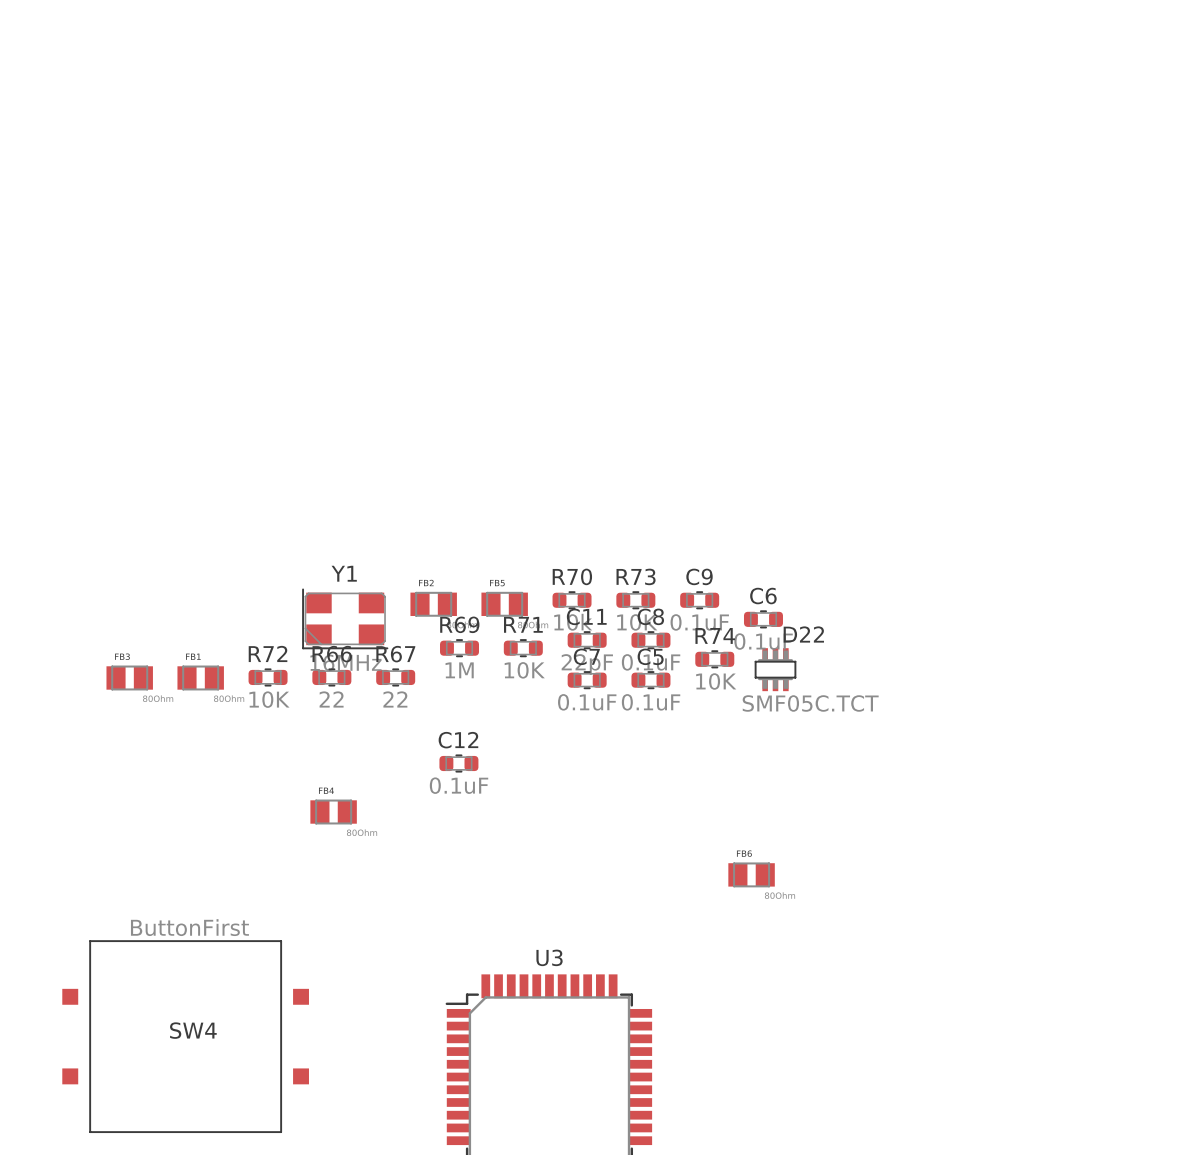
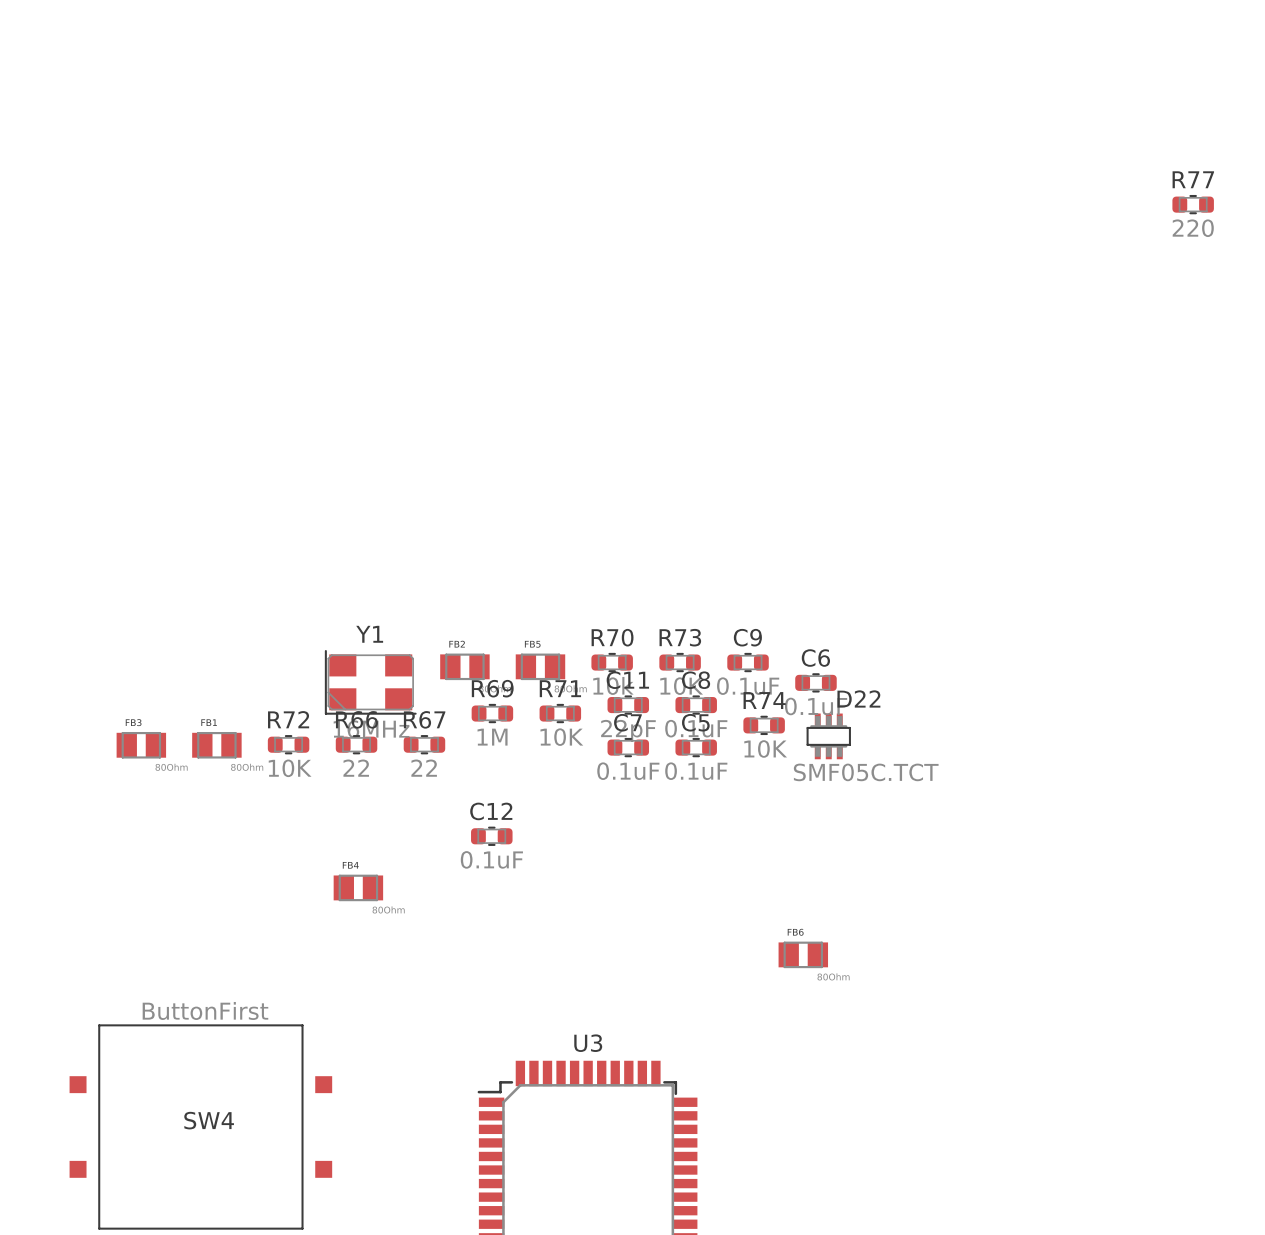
R77: none -> 220 (1193, 204)

